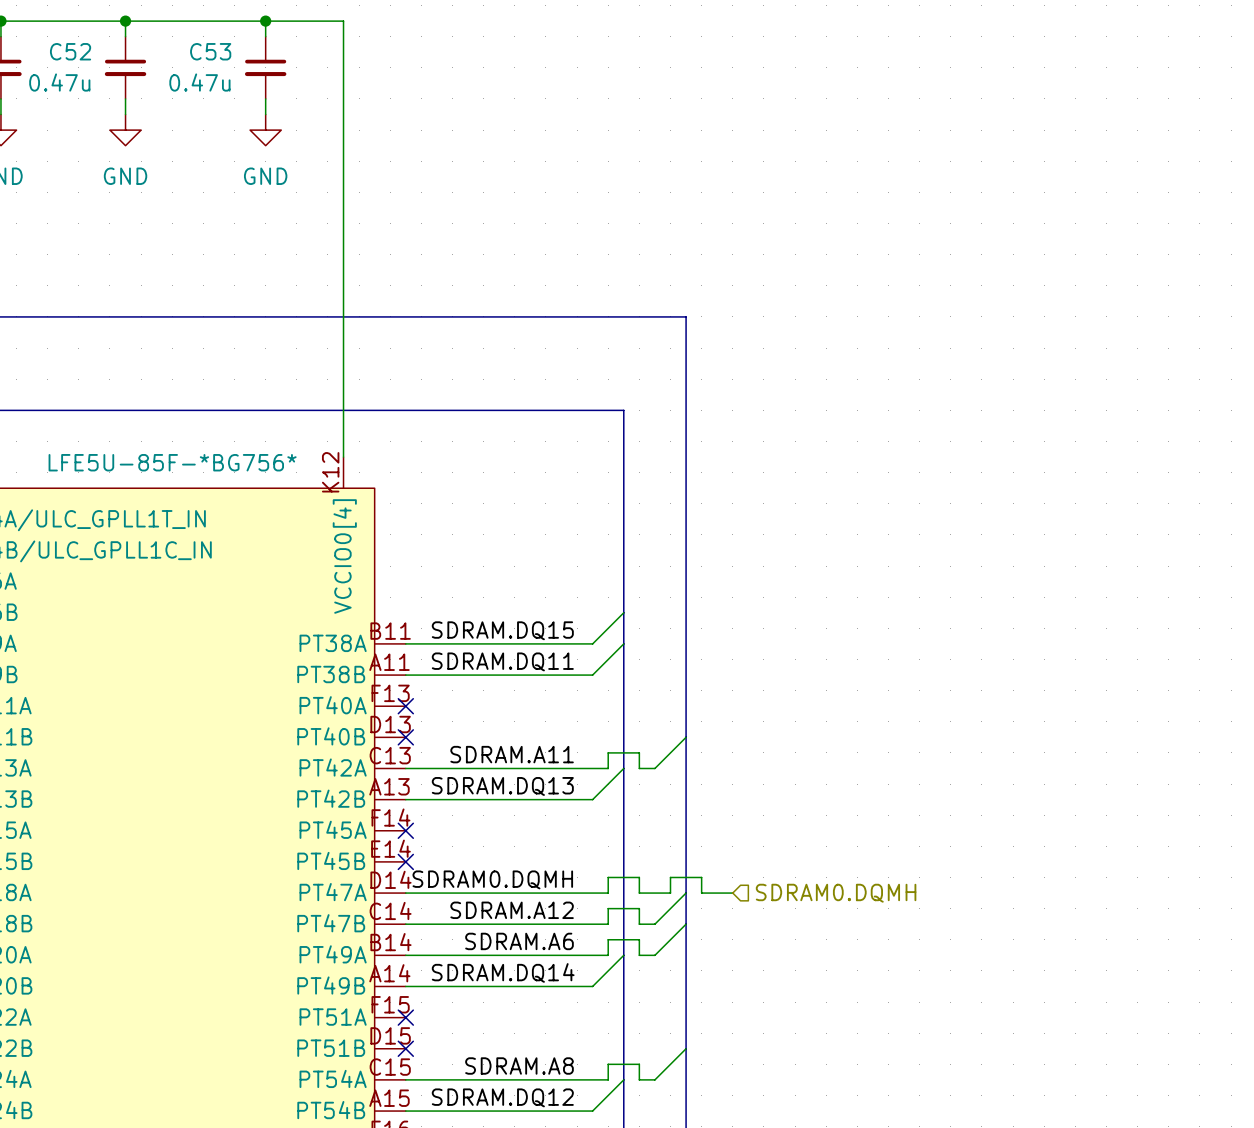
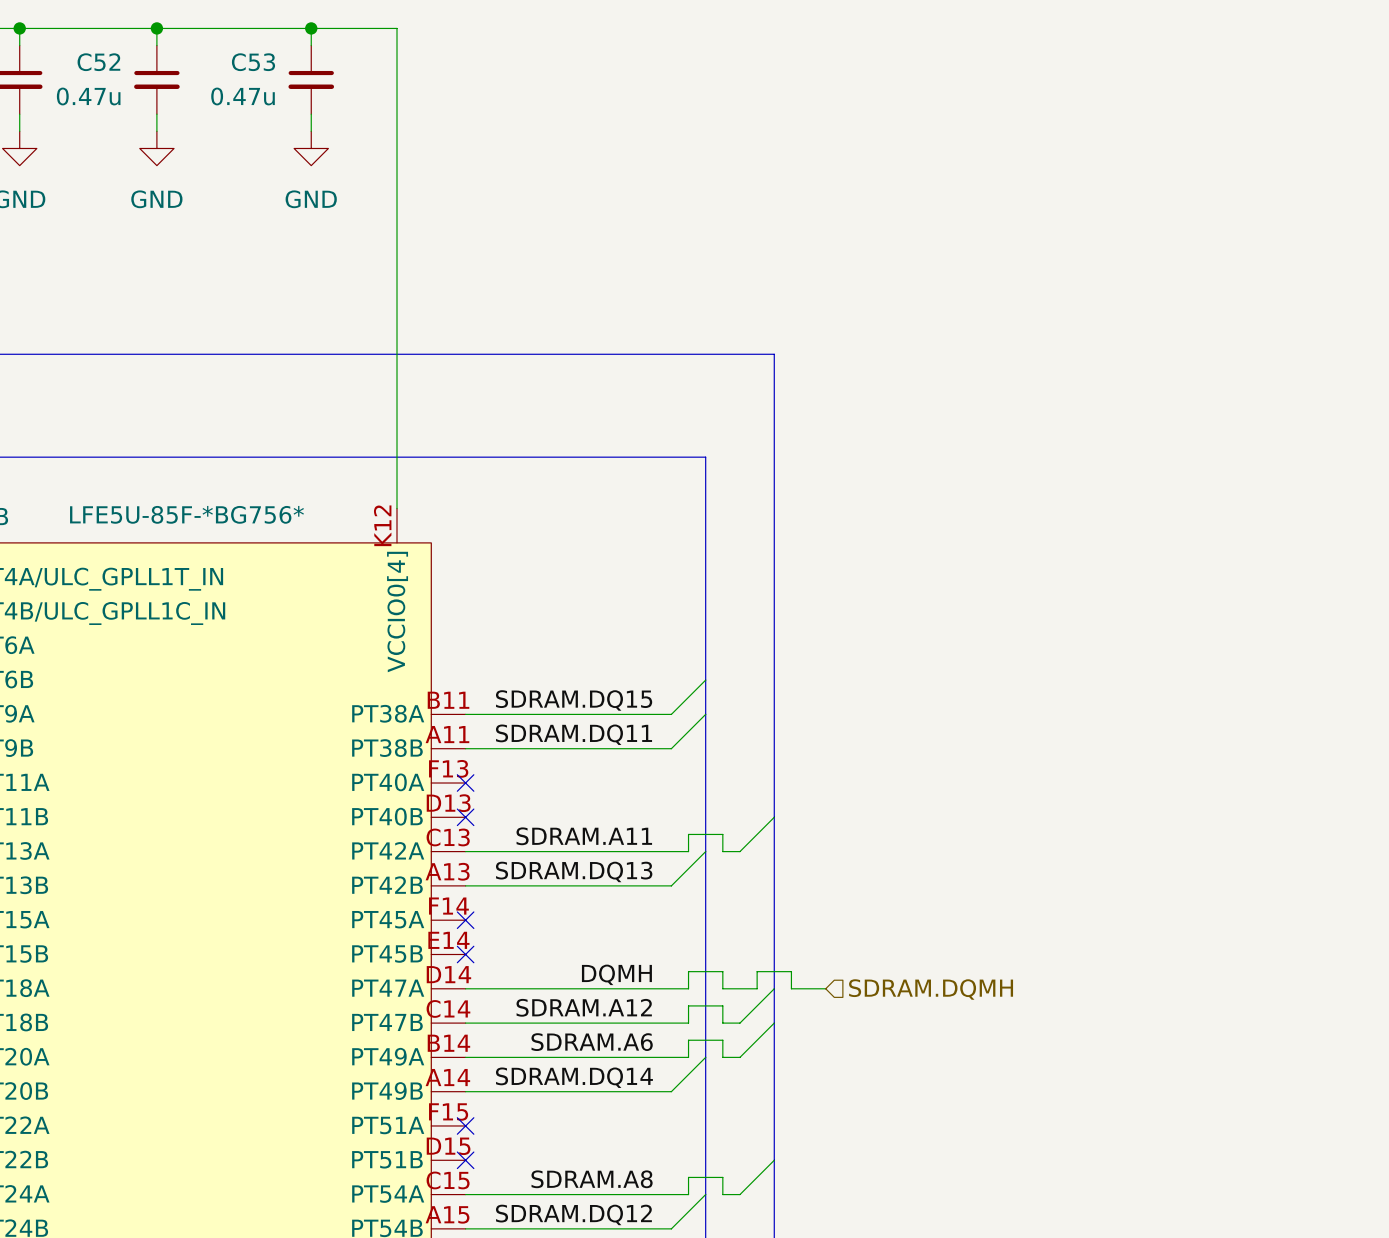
label: SDRAM0.DQMH (492, 879) -> DQMH (616, 974)
hierarchical label: SDRAM0.DQMH (836, 893) -> SDRAM.DQMH (931, 989)

